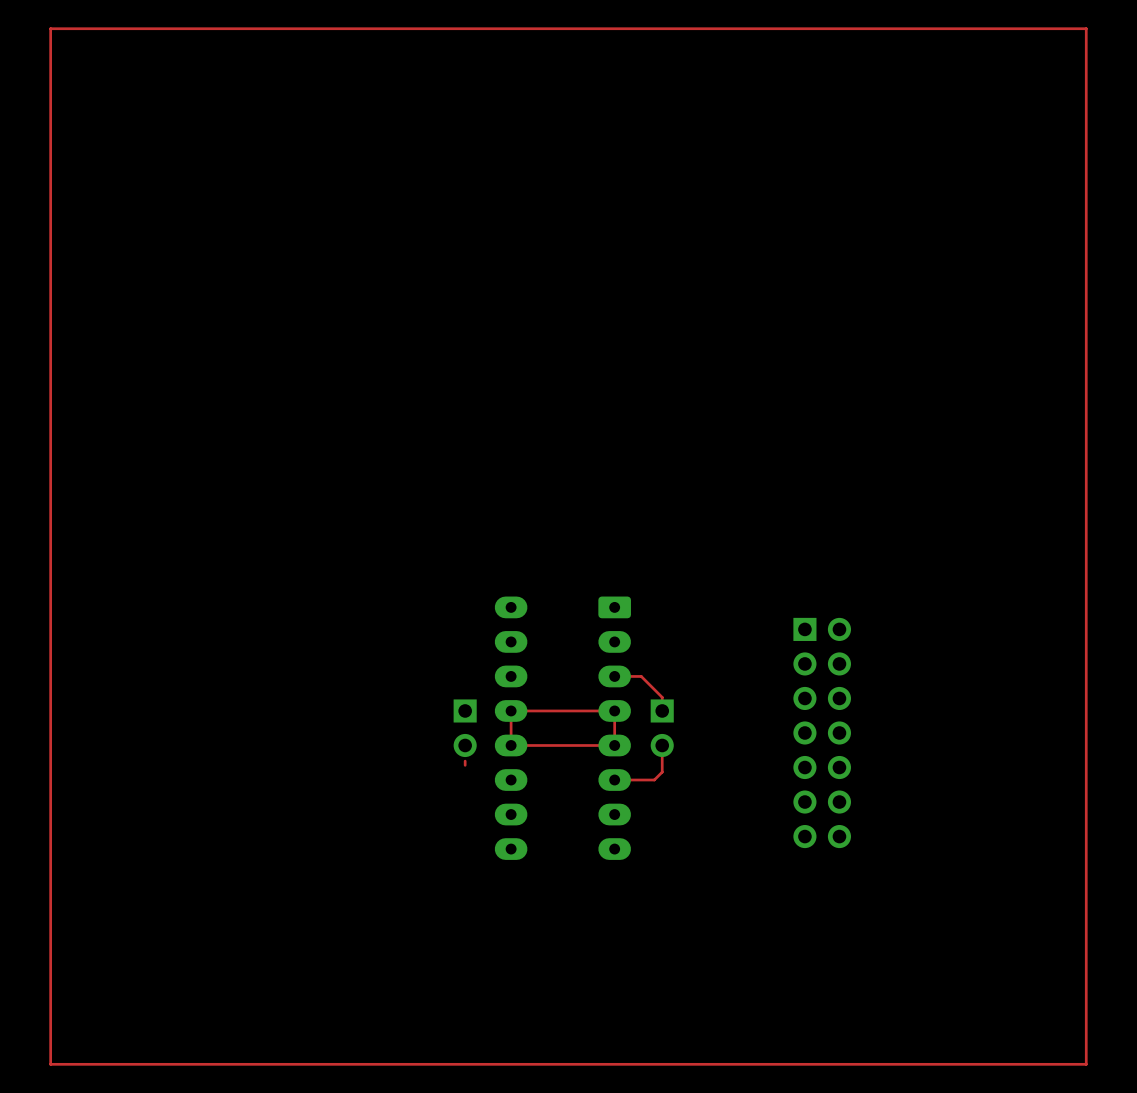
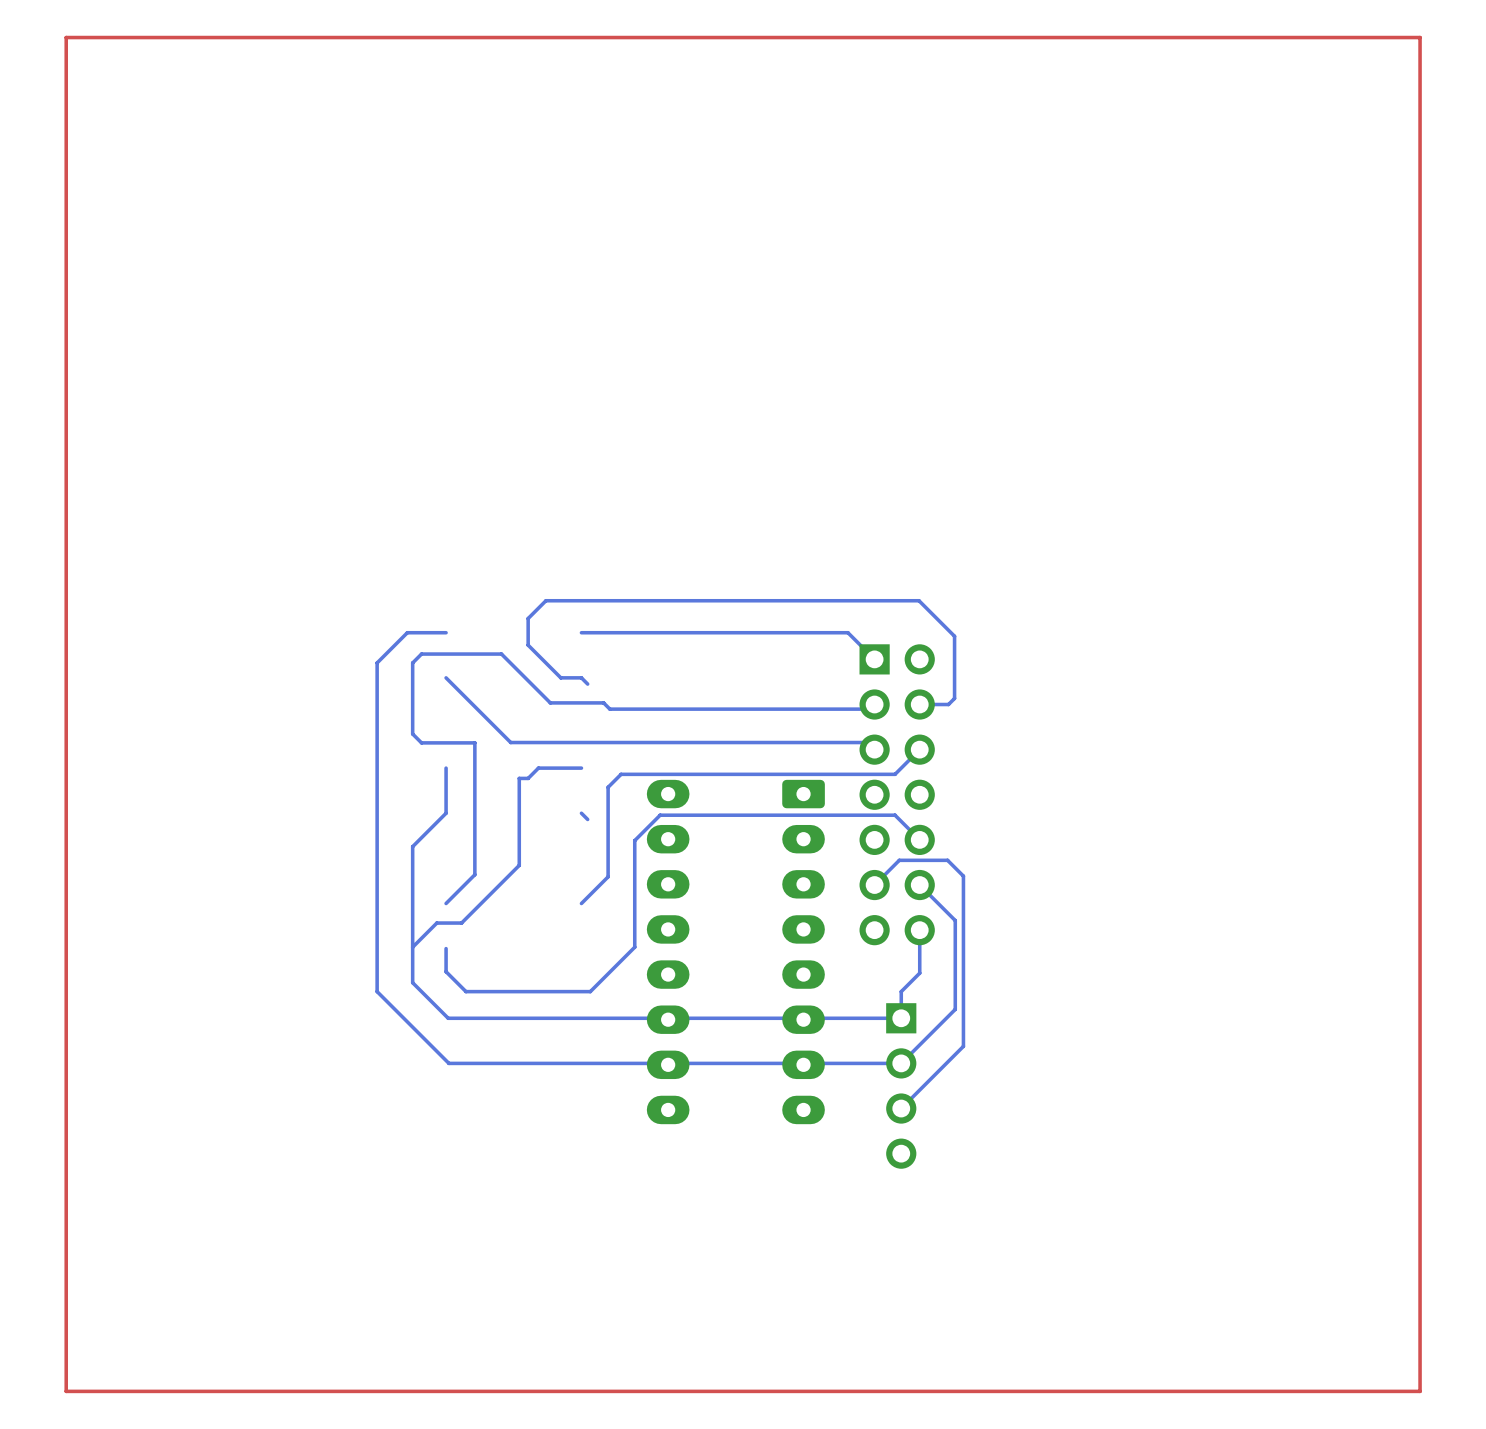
bottom track: none -> (446, 632) (407, 632) (377, 662) (377, 991) (448, 1063) (901, 1063) (955, 1009) (955, 920) (919, 885)
bottom track: none -> (581, 632) (847, 632) (874, 659)
bottom track: none -> (446, 677) (510, 742) (867, 742) (874, 749)
bottom track: none -> (587, 684) (581, 677) (560, 677) (528, 645) (528, 618) (545, 600) (919, 600) (954, 636) (954, 698) (948, 704) (919, 704)
bottom track: none -> (867, 697) (874, 704) (869, 709) (609, 709) (603, 702) (550, 702) (501, 654) (421, 654) (412, 662) (412, 734) (421, 742) (474, 742) (474, 874) (446, 903)
bottom track: none -> (919, 749) (895, 774) (621, 774) (608, 787) (608, 876) (581, 903)
bottom track: none -> (446, 768) (446, 813) (412, 846) (412, 982) (448, 1018) (901, 1018)
bottom track: none -> (581, 768) (538, 768) (528, 778) (519, 778) (519, 865) (461, 923) (436, 923) (412, 947)
bottom track: none -> (581, 813) (587, 819)
bottom track: none -> (919, 839) (895, 815) (660, 815) (634, 840) (634, 947) (590, 991) (465, 991) (446, 971) (446, 948)
top track: (614, 676) (641, 676) (662, 697) (662, 710) -> none
bottom track: none -> (874, 885) (899, 860) (947, 860) (963, 876) (963, 1046) (901, 1108)
top track: (614, 710) (614, 745) (511, 745) (511, 710) (614, 710) -> none
bottom track: none -> (919, 930) (919, 973) (901, 991) (901, 1018)
part: (465, 728) -> none
part: (662, 728) -> none
part position: (822, 732) -> (897, 794)
top track: (662, 745) (662, 772) (654, 780) (614, 780) -> none
top track: (465, 761) (465, 765) -> none
part: none -> (901, 1085)

